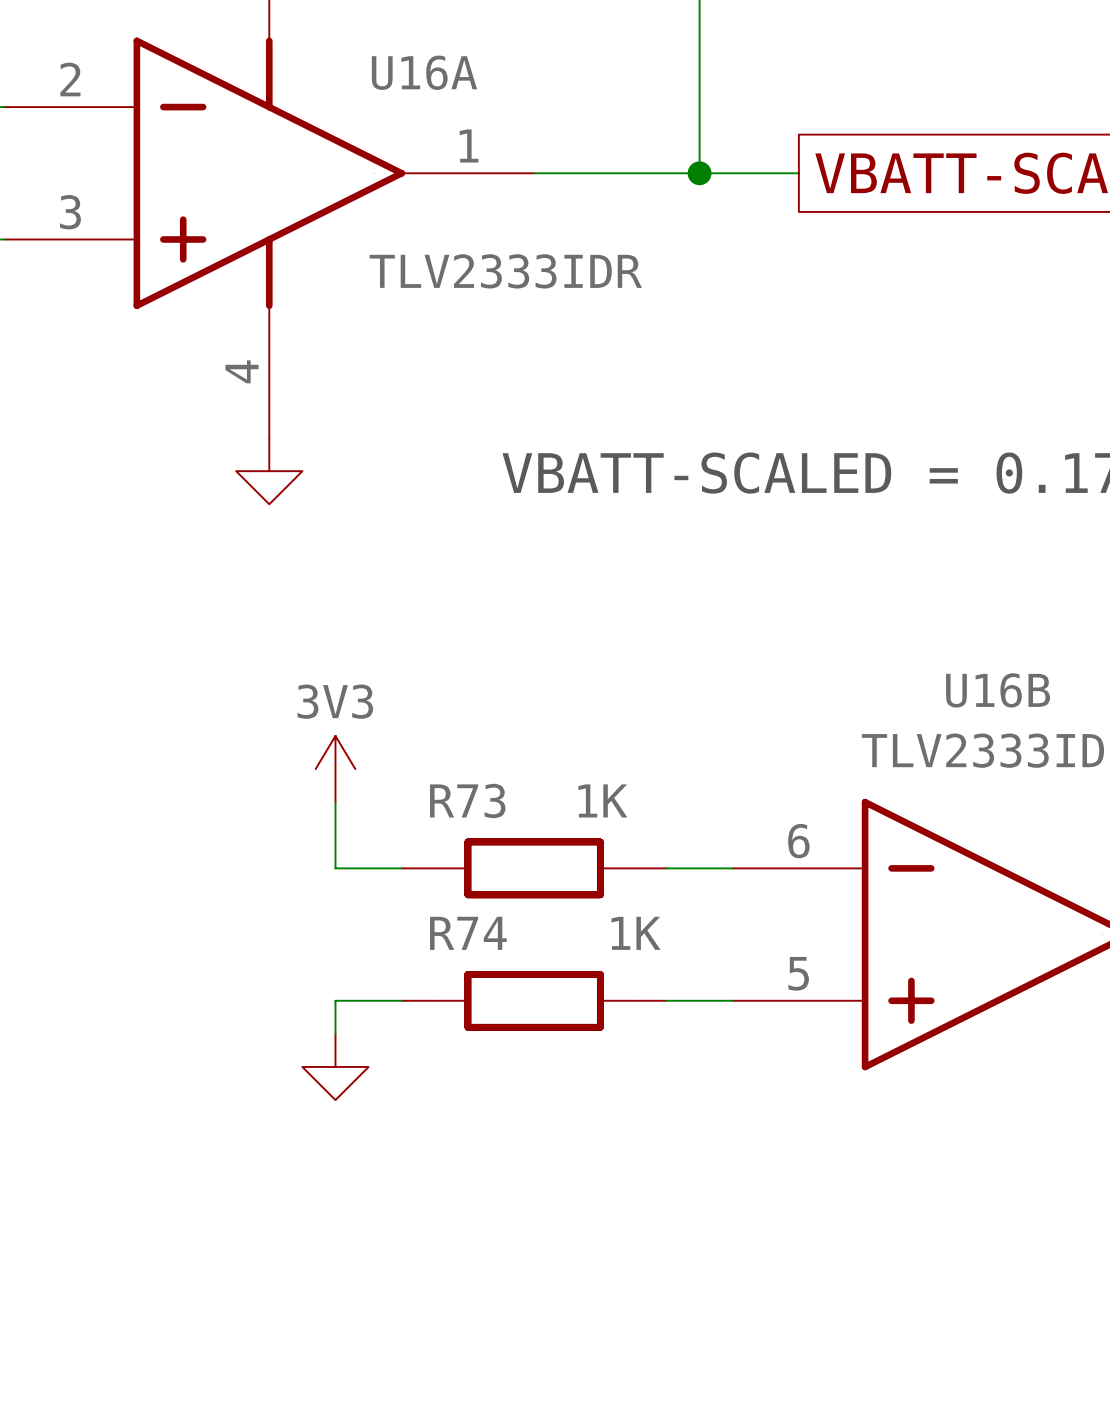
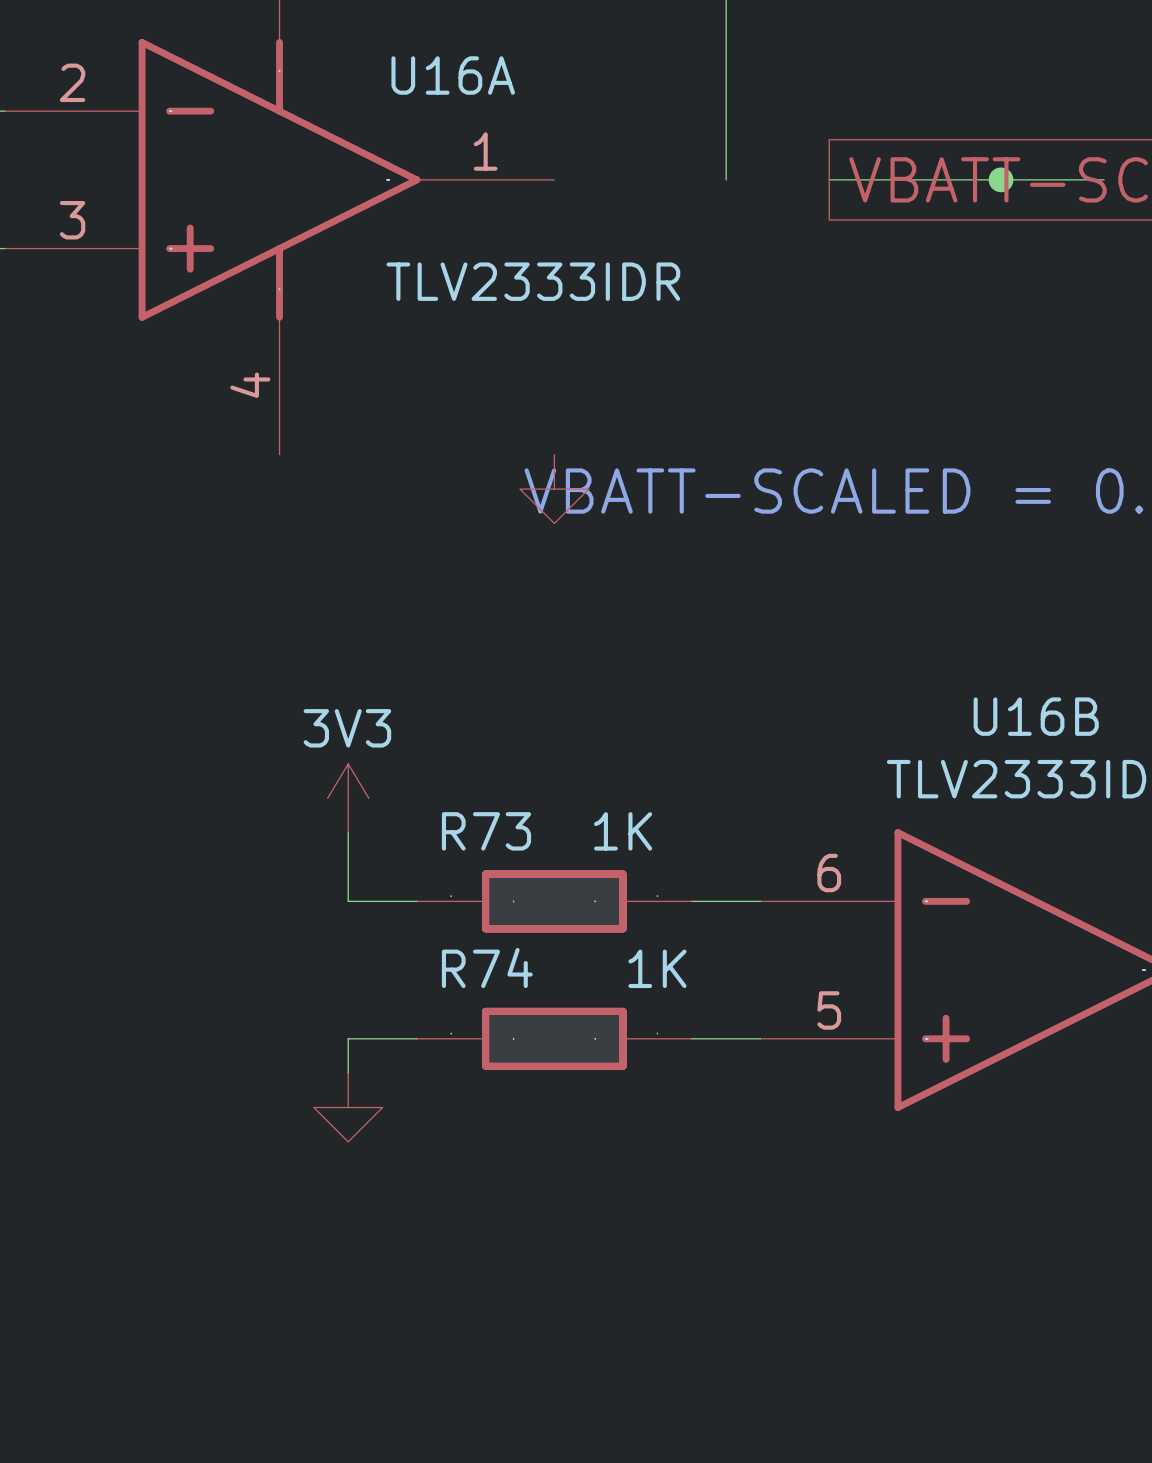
wire: (534, 173) (798, 173) -> (1104, 179) (829, 179)
junction: (699, 173) -> none
junction: none -> (1001, 179)
power symbol: (269, 471) -> none
power symbol: none -> (554, 489)

